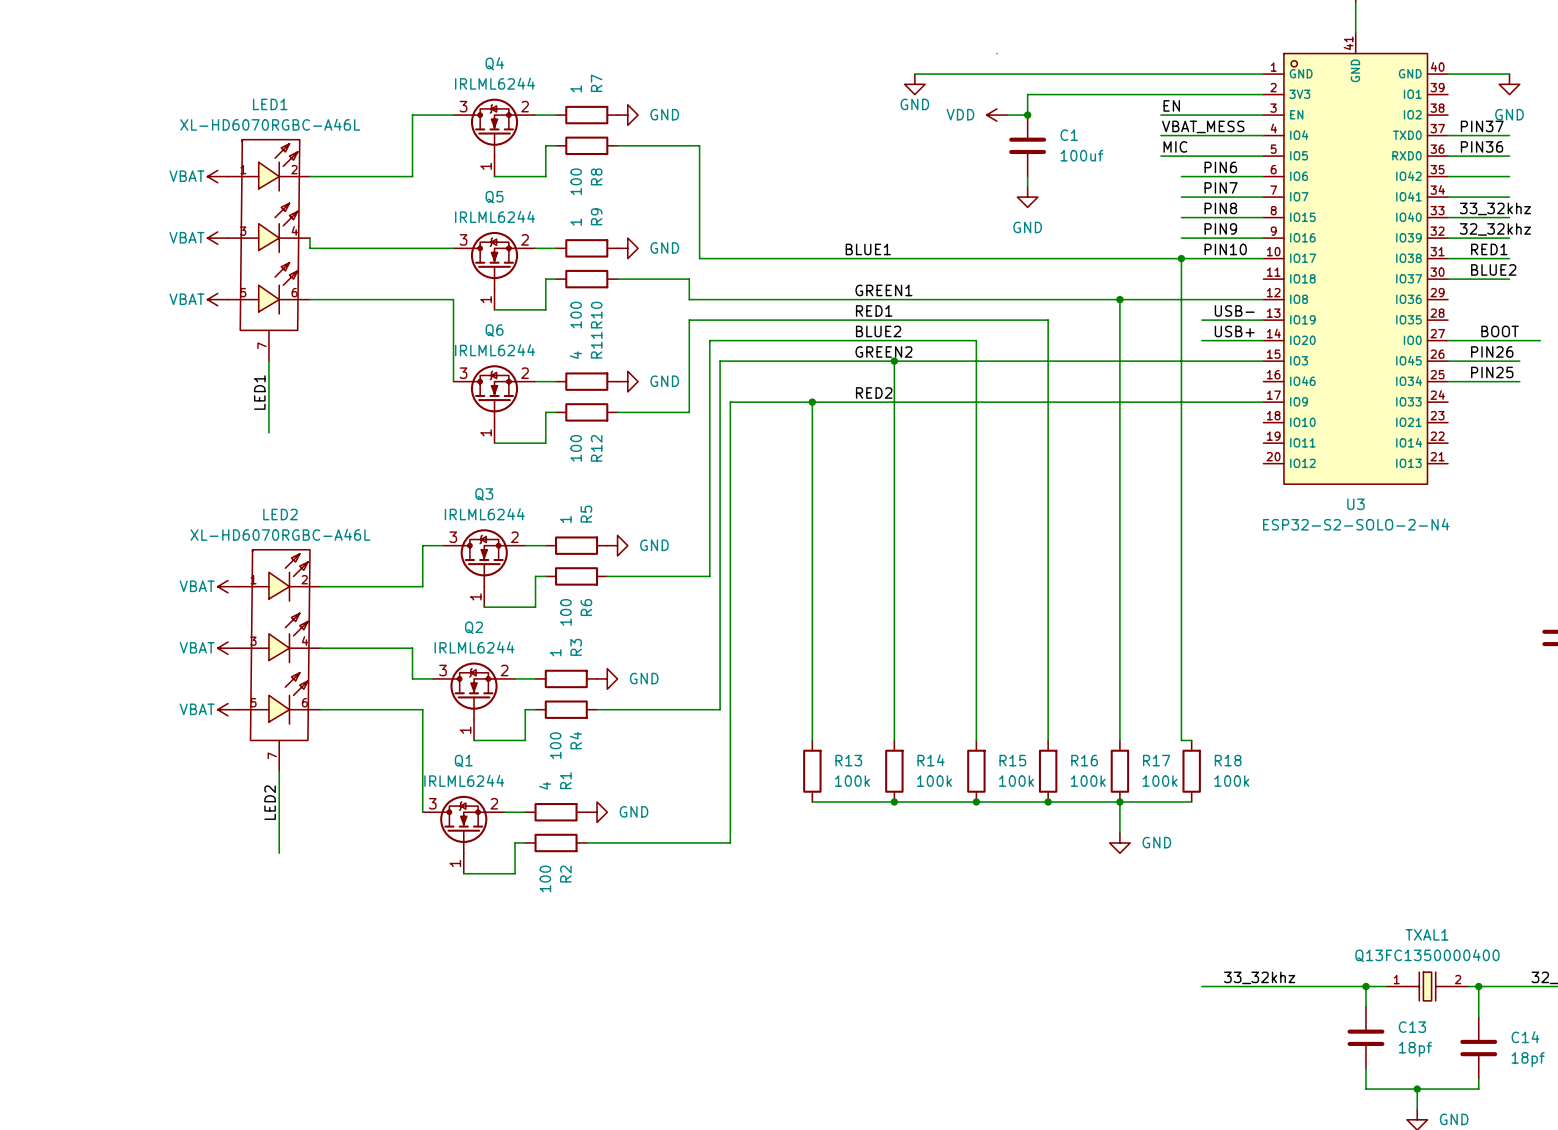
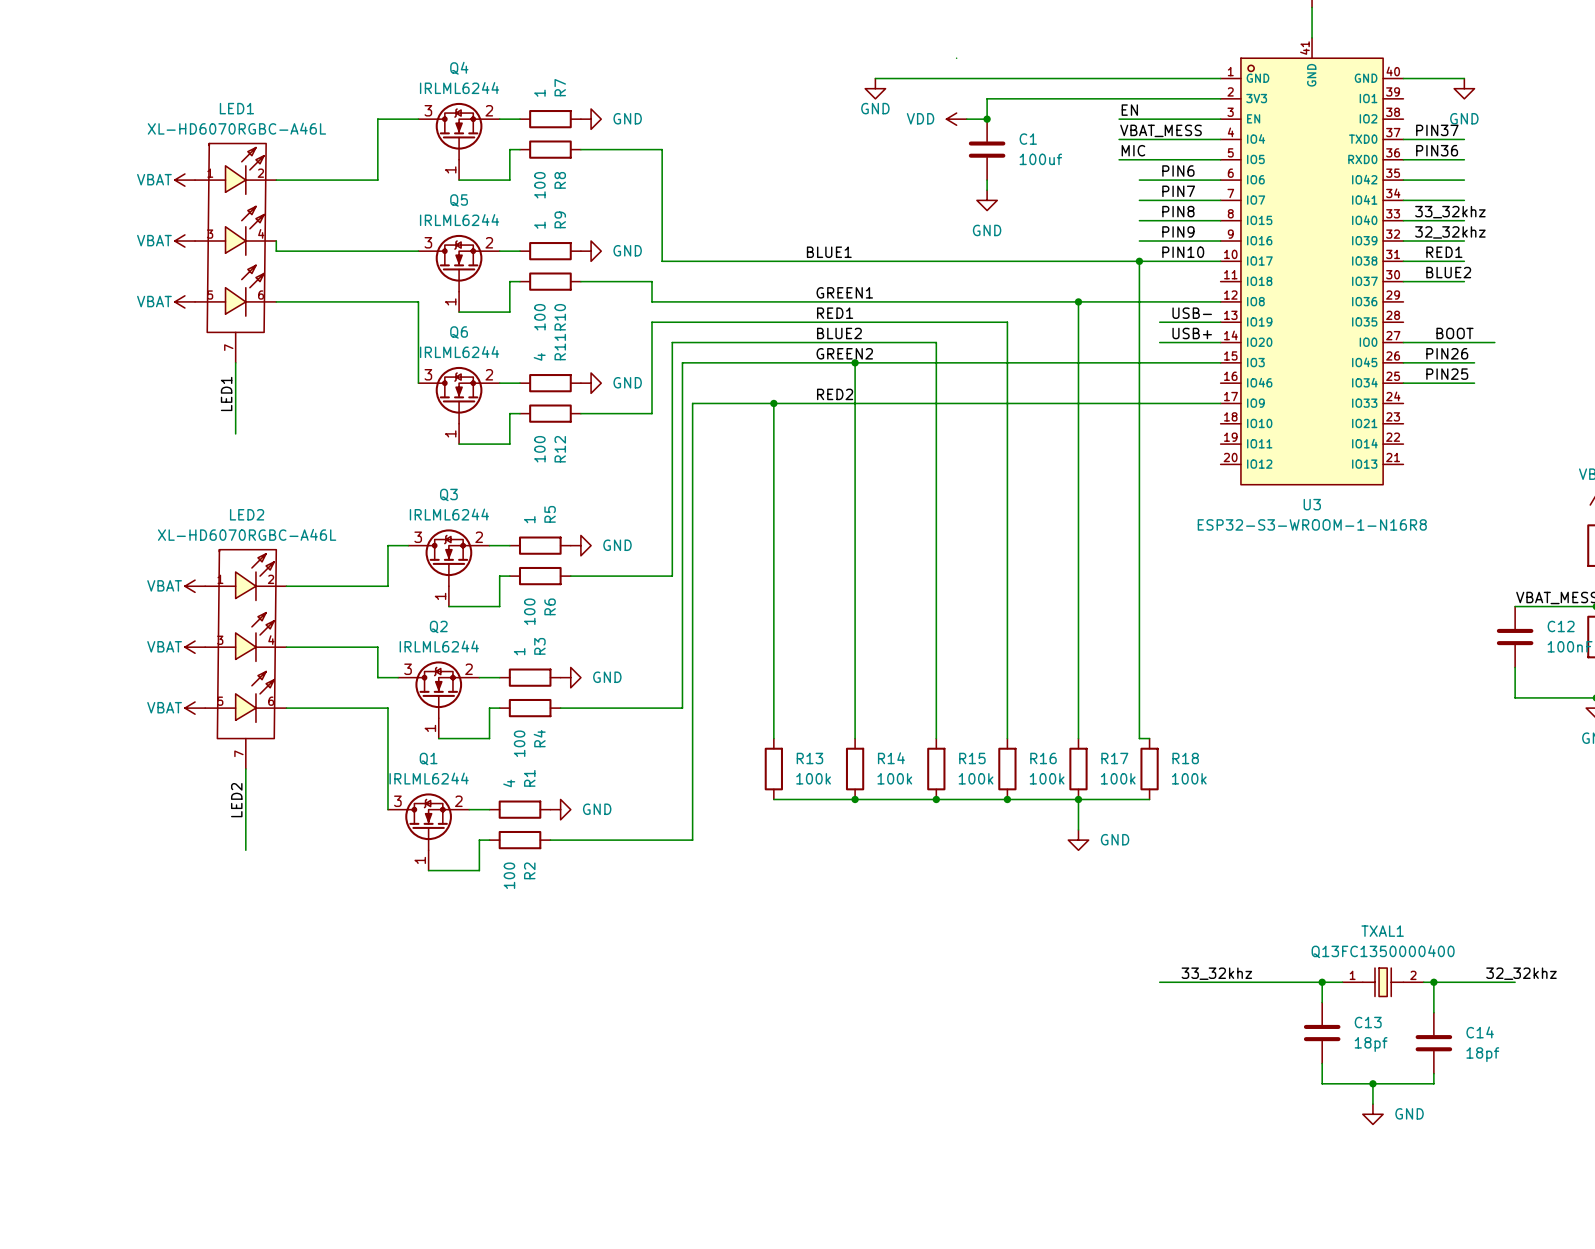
U3 value: ESP32-S2-SOLO-2-N4 (1356, 524) -> ESP32-S3-WROOM-1-N16R8 (1312, 524)

